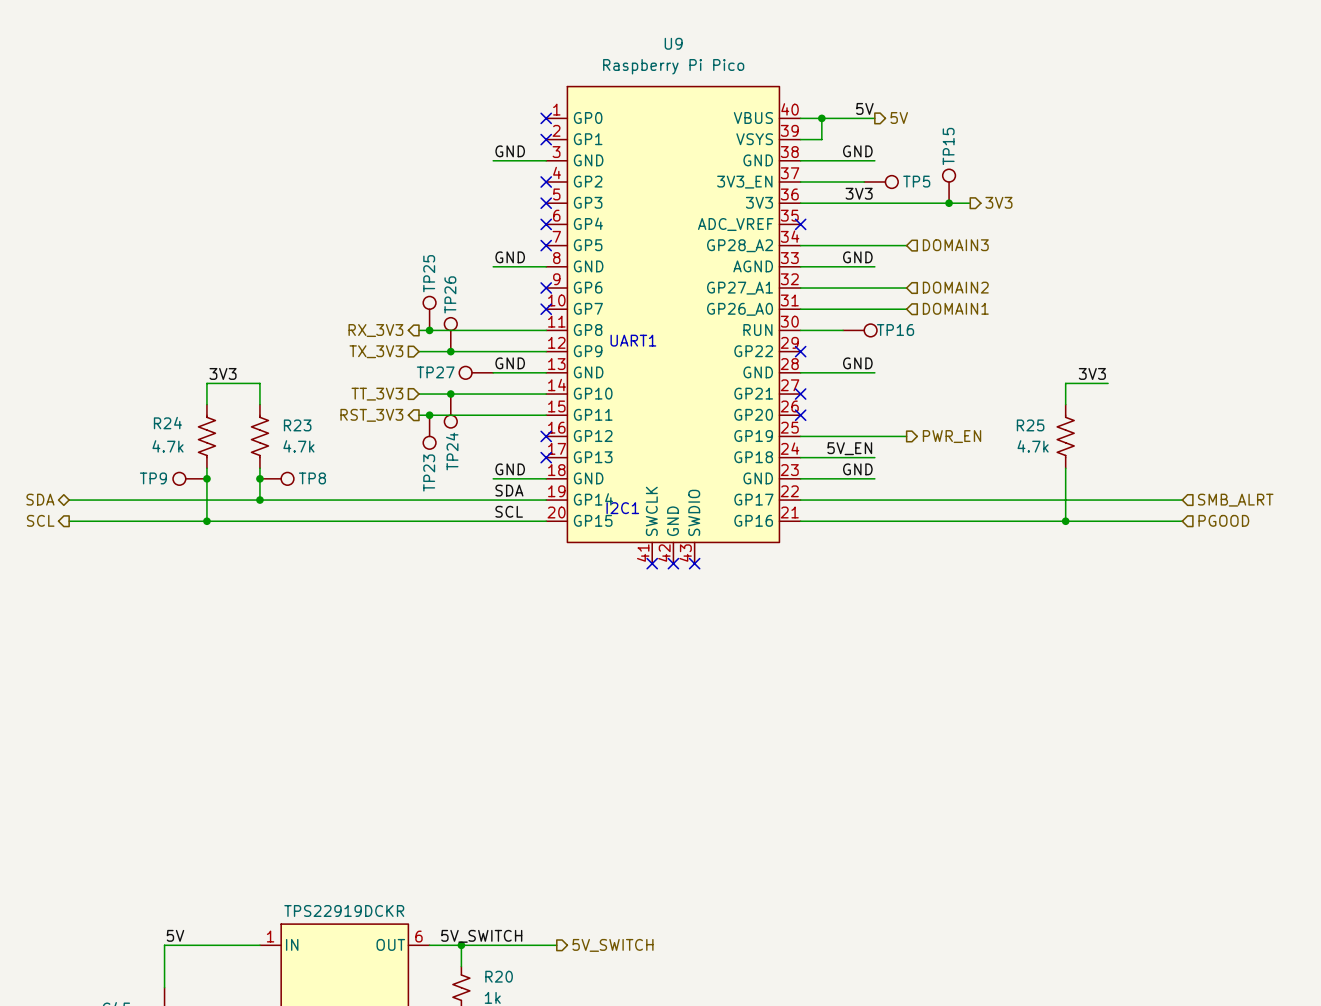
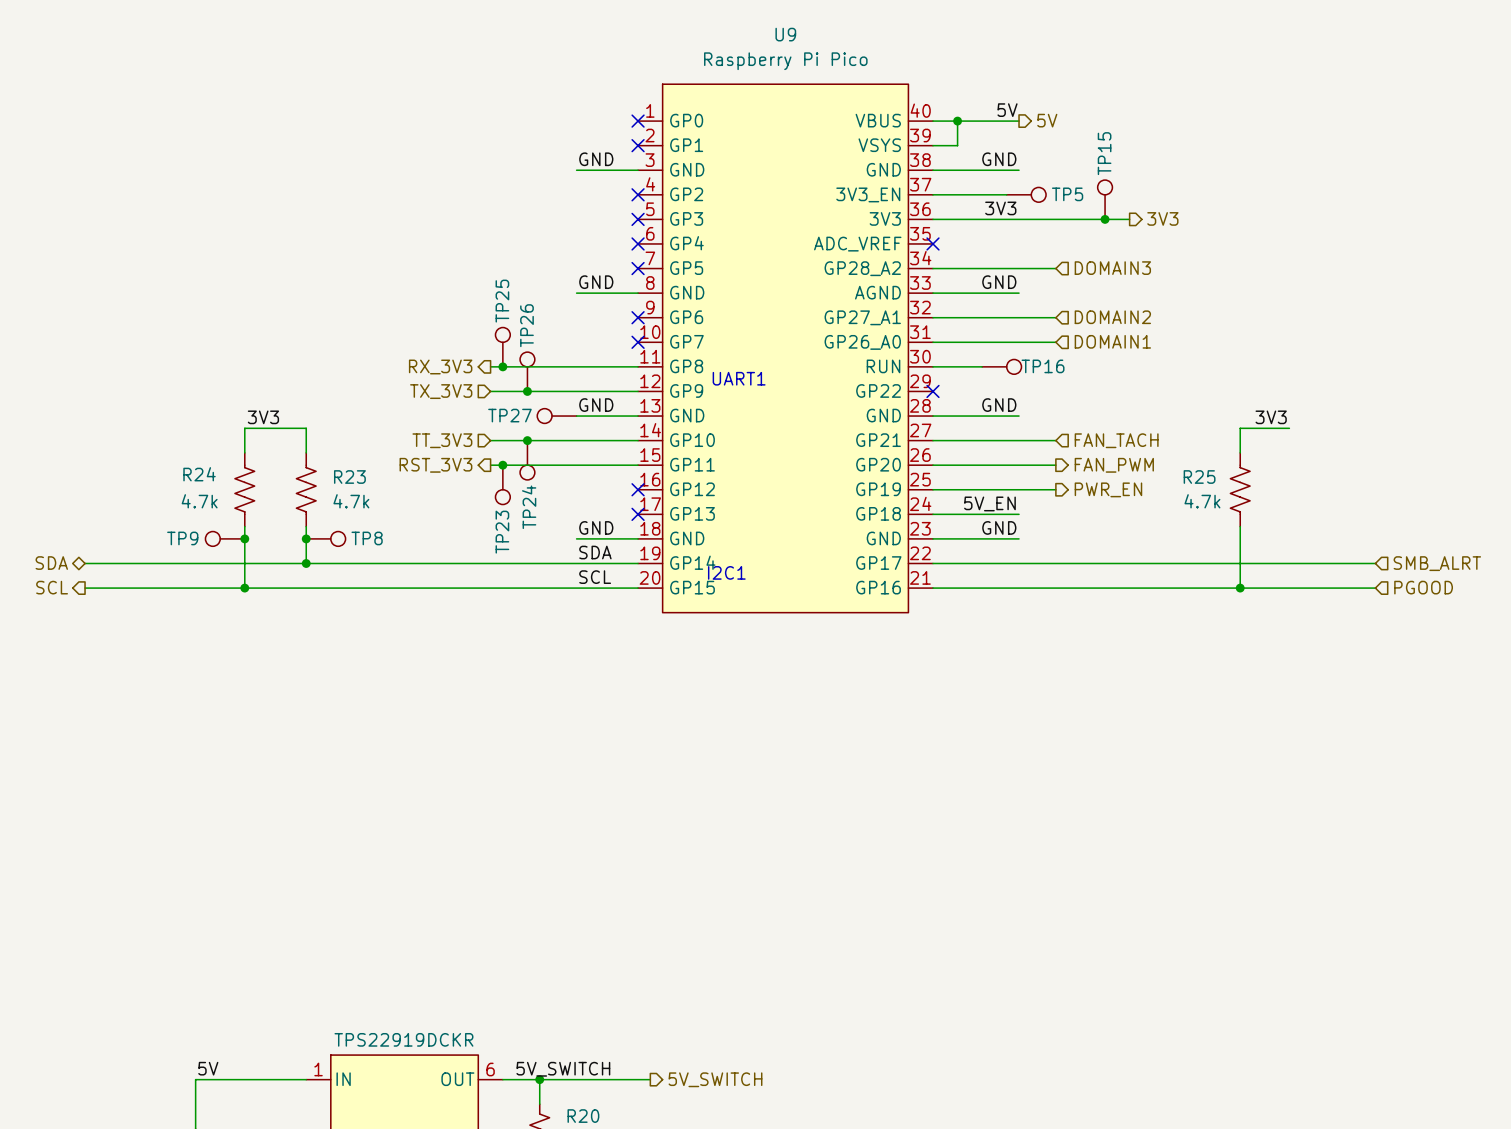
U9 symbol: [546, 86, 801, 564] -> [638, 84, 933, 613]
wire: none -> (932, 440) (1055, 440)
no-connect mark: (800, 394) -> none
hierarchical label: none -> FAN_TACH (1116, 440)
wire: none -> (932, 465) (1055, 465)
no-connect mark: (800, 415) -> none
hierarchical label: none -> FAN_PWM (1114, 465)
no-connect mark: (652, 563) -> none
no-connect mark: (673, 563) -> none
no-connect mark: (694, 563) -> none

